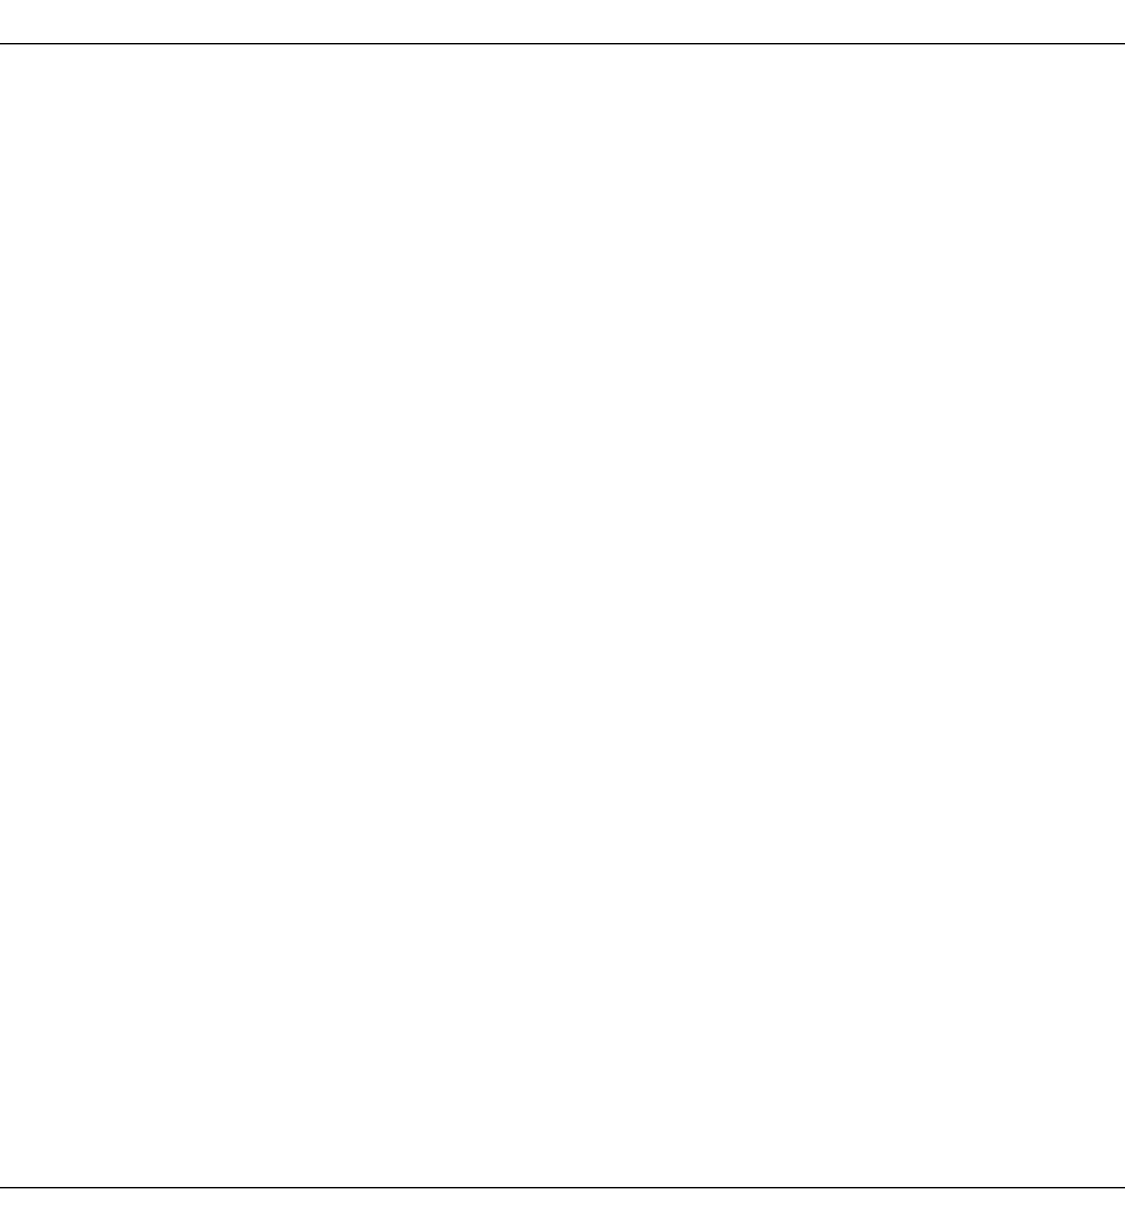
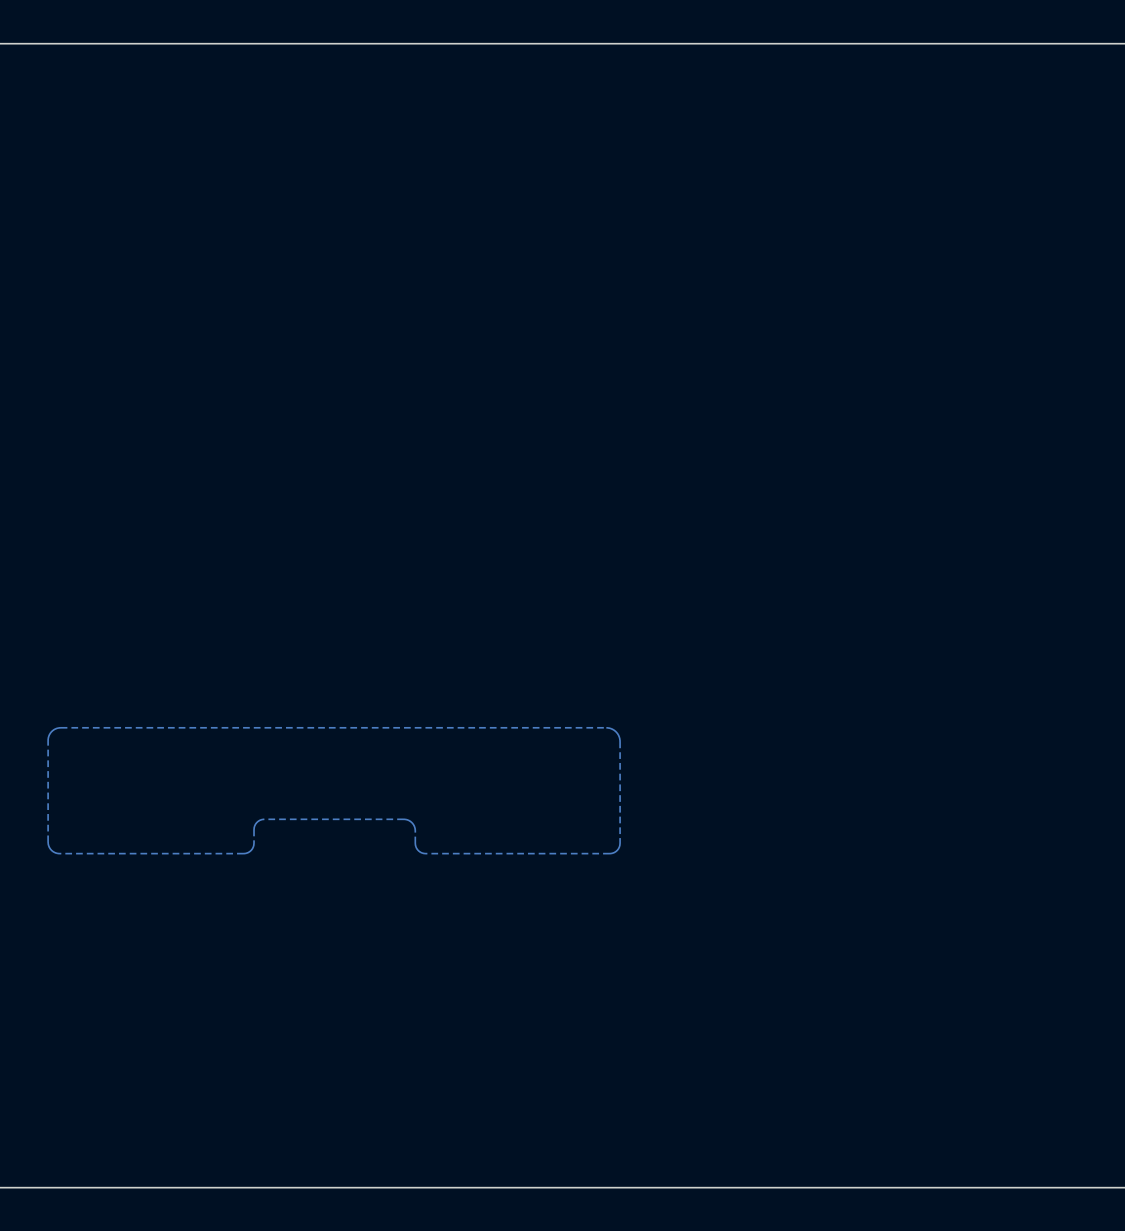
bottom zone outline: none -> (60, 727) (51, 731) (48, 740) (48, 843) (51, 850) (56, 853) (245, 853) (253, 847) (255, 824) (264, 819) (406, 819) (414, 826) (416, 848) (424, 853) (609, 853) (616, 851) (619, 846) (619, 739) (617, 733) (609, 728) (60, 727)

